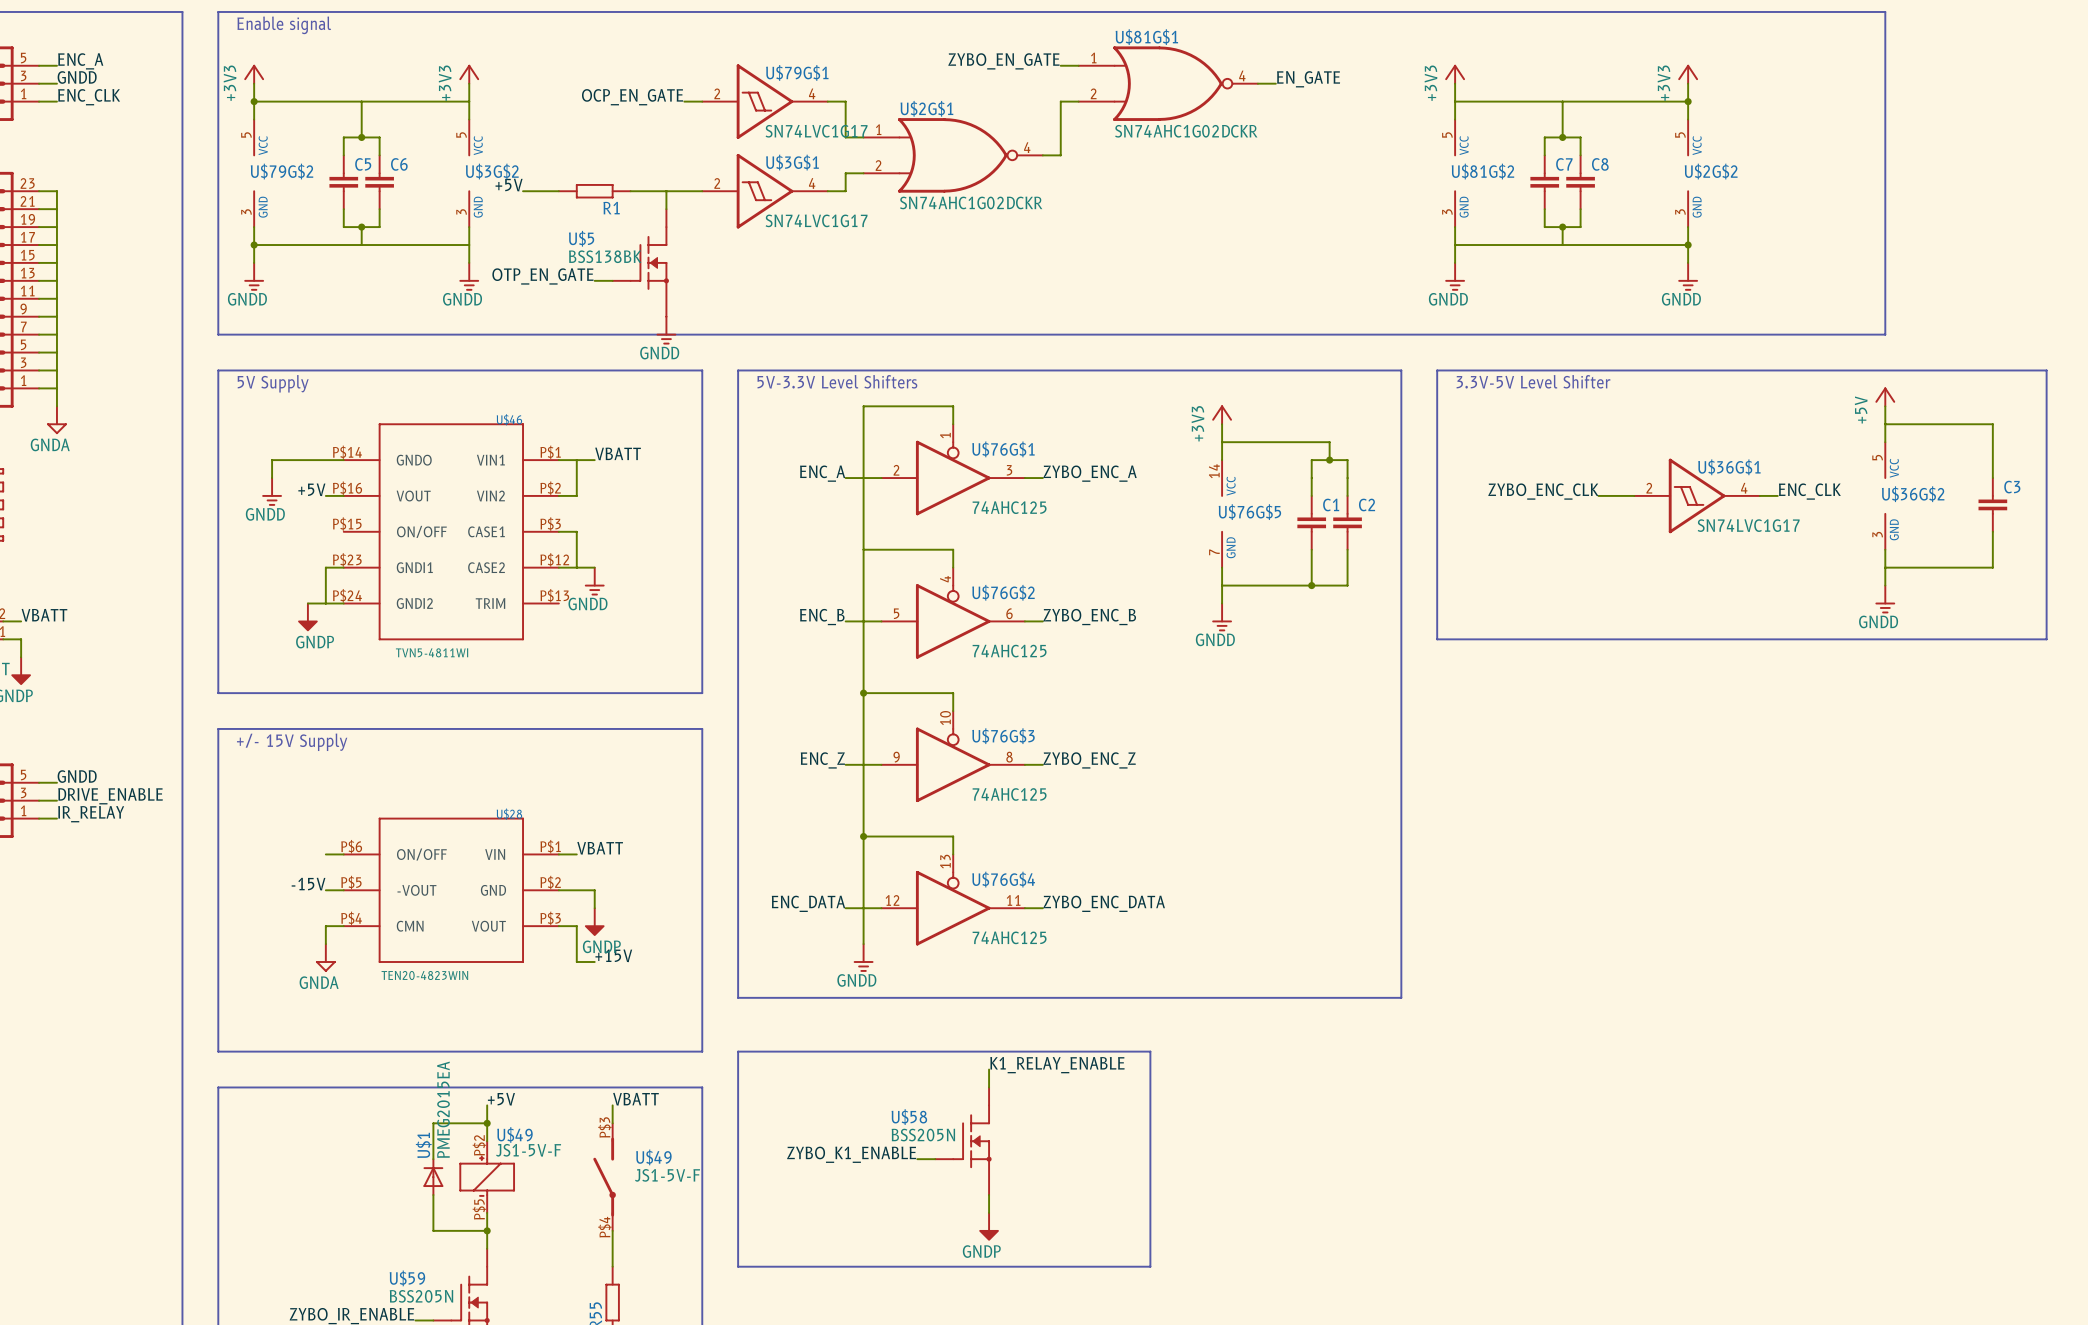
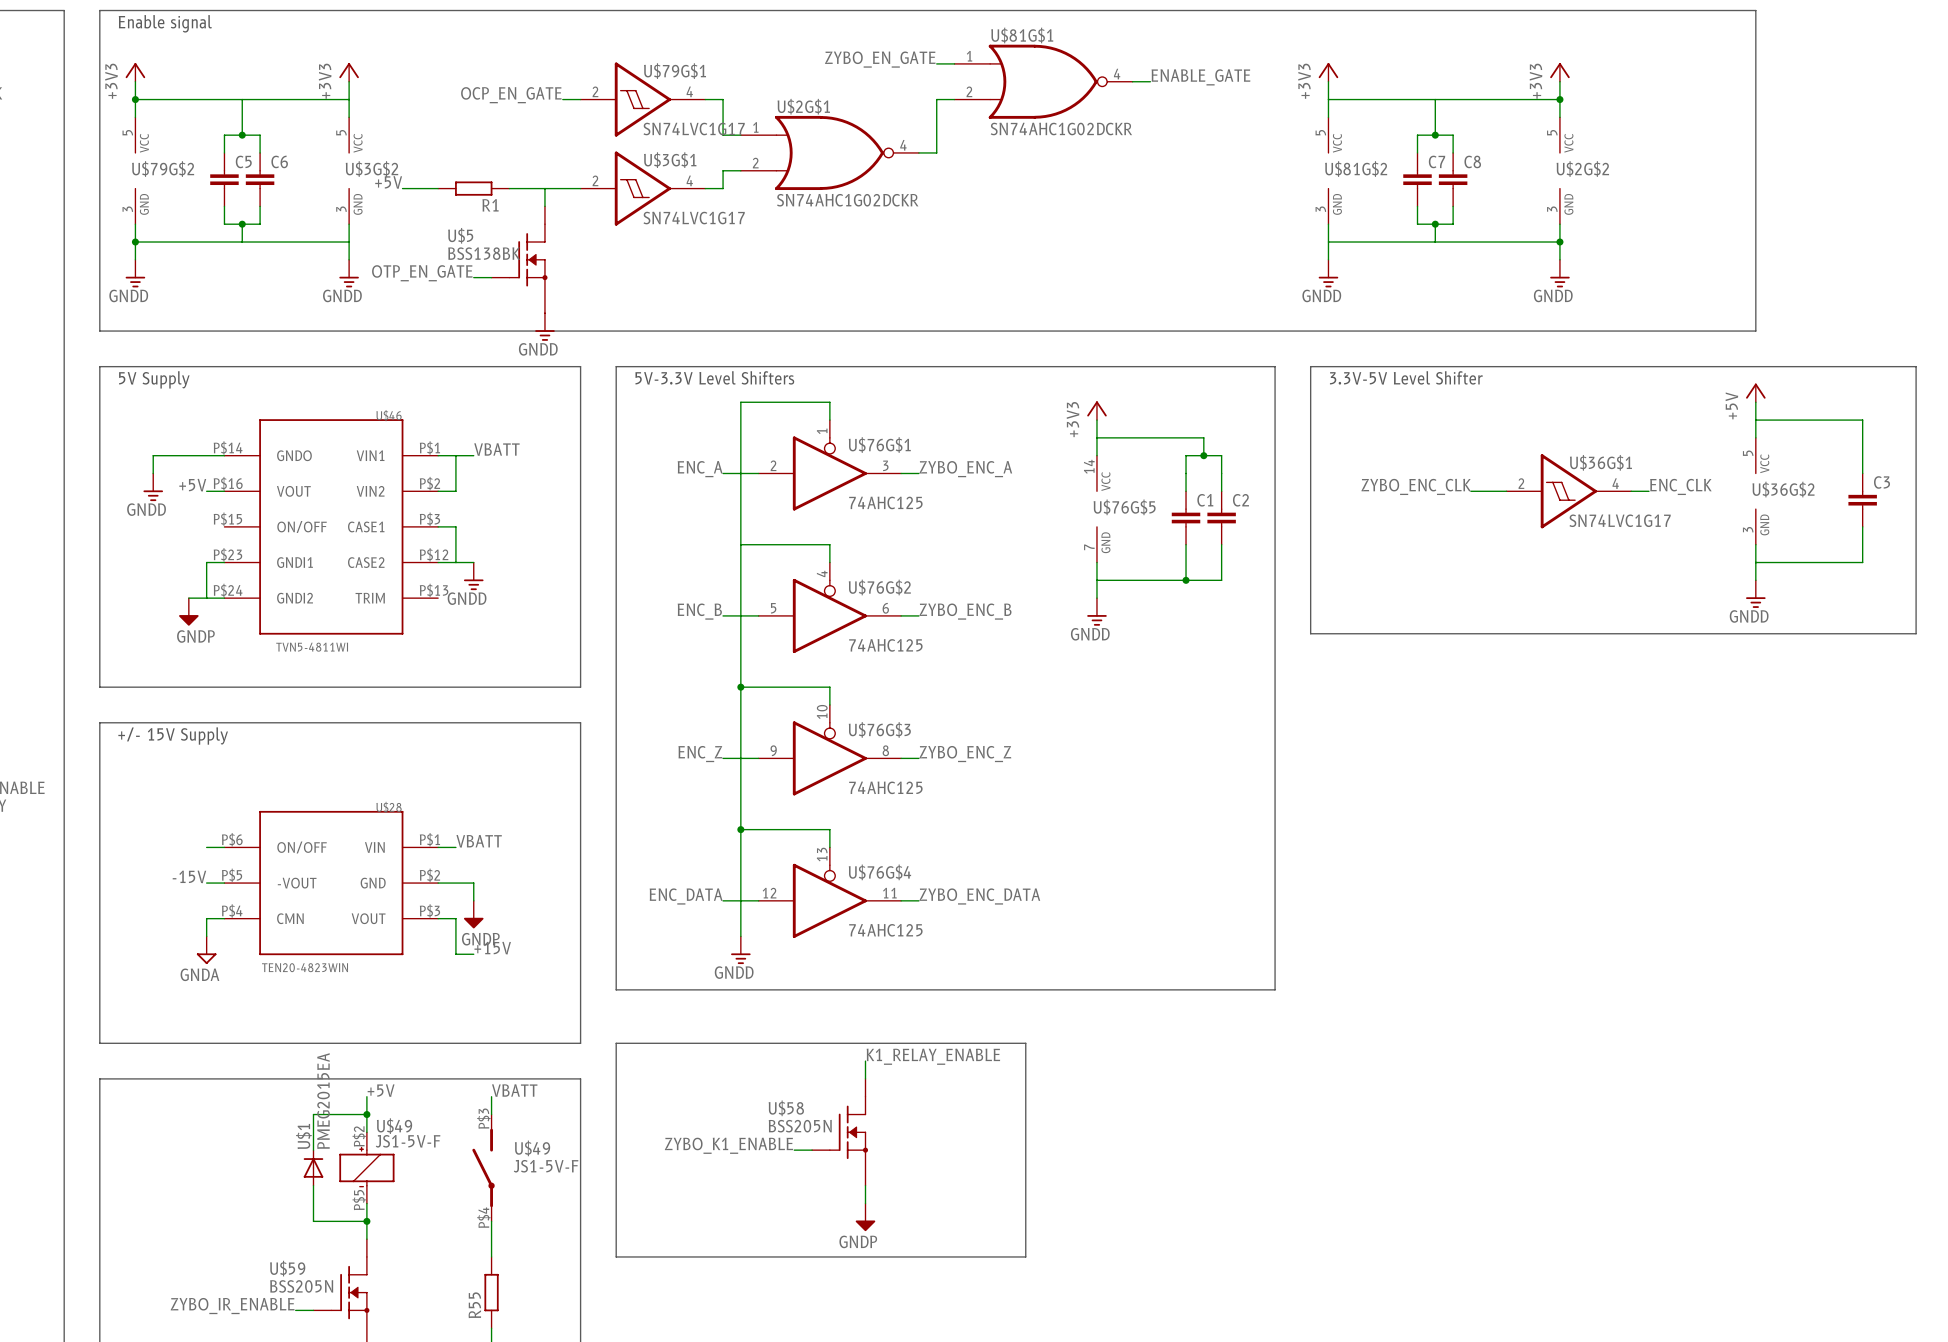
label: EN_GATE (1308, 79) -> ENABLE_GATE (1200, 77)

